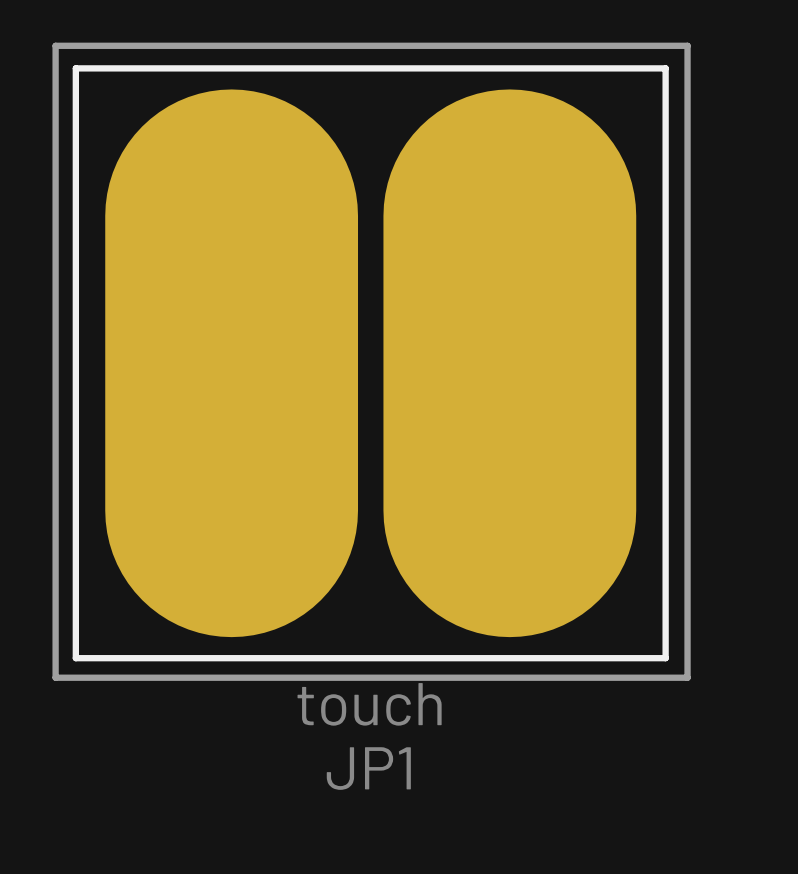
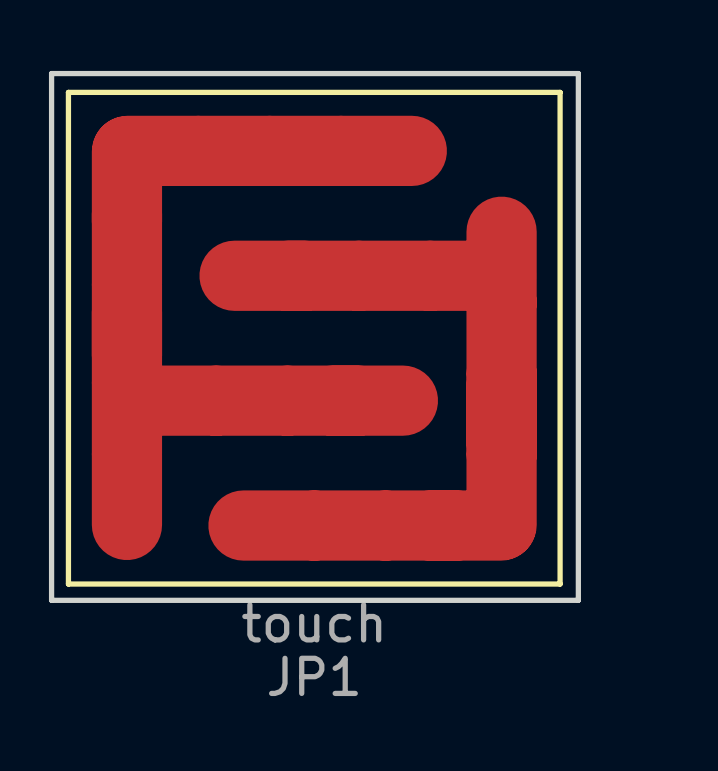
JP1 footprint: [72, 65, 669, 662] -> [65, 89, 563, 587]

